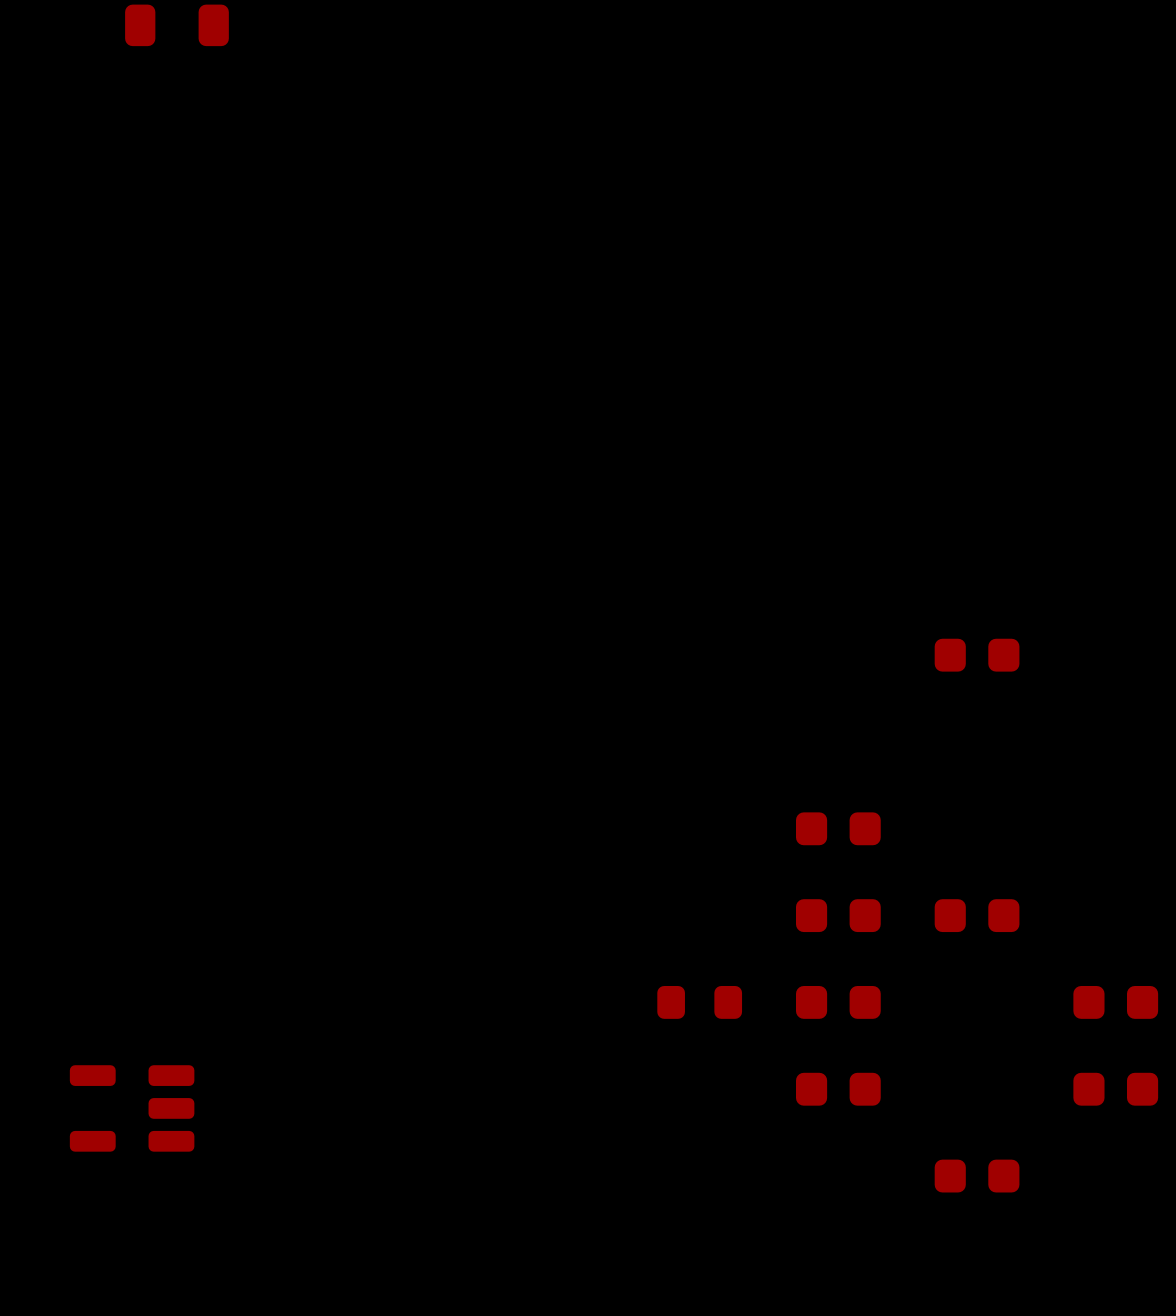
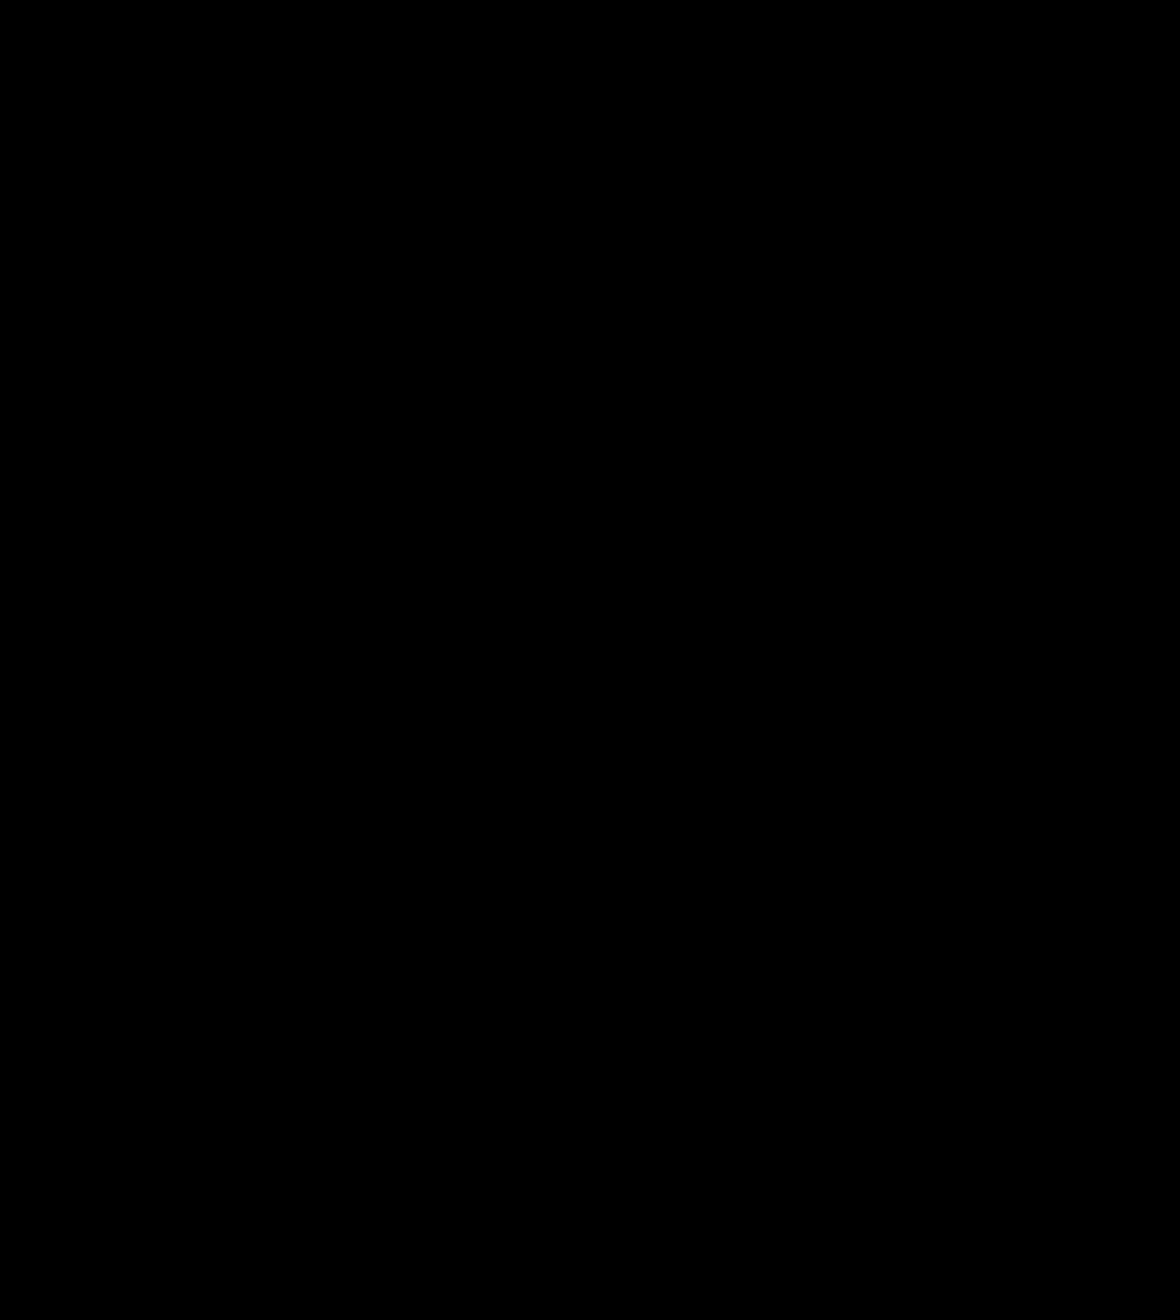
part: (176, 25) -> none
part: (977, 655) -> none
part: (838, 828) -> none
part: (838, 915) -> none
part: (977, 915) -> none
part: (699, 1002) -> none
part: (838, 1002) -> none
part: (1115, 1002) -> none
part: (838, 1089) -> none
part: (1115, 1089) -> none
part: (132, 1108) -> none
part: (977, 1176) -> none

